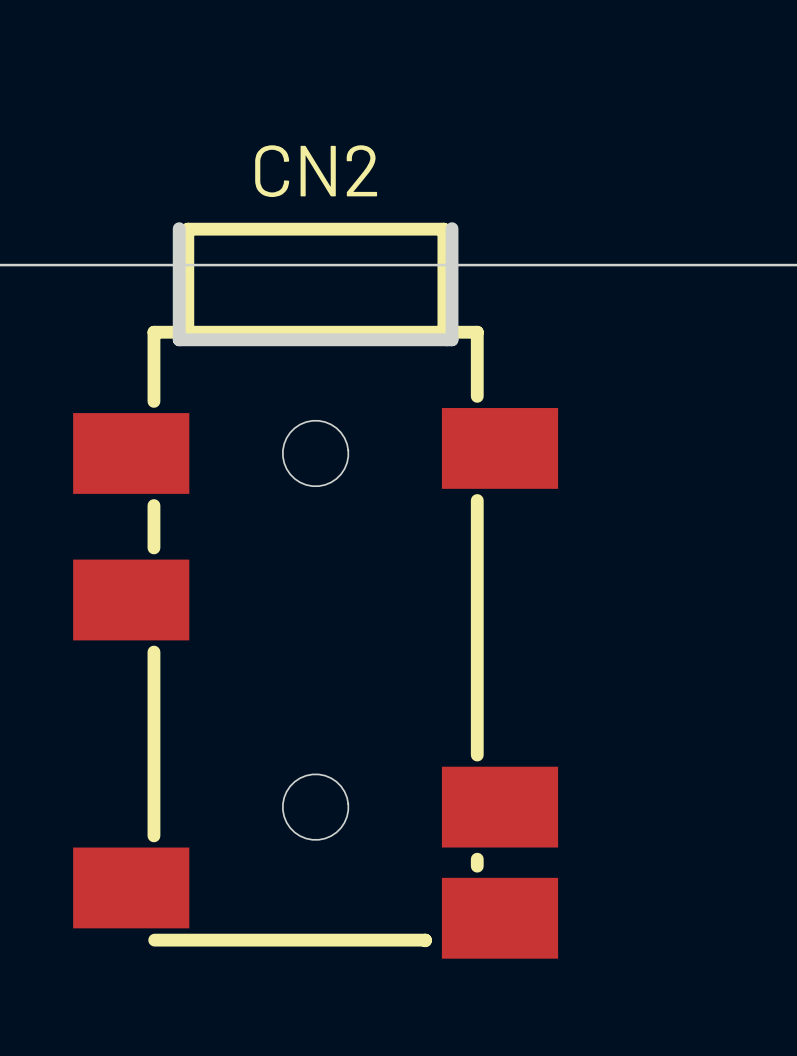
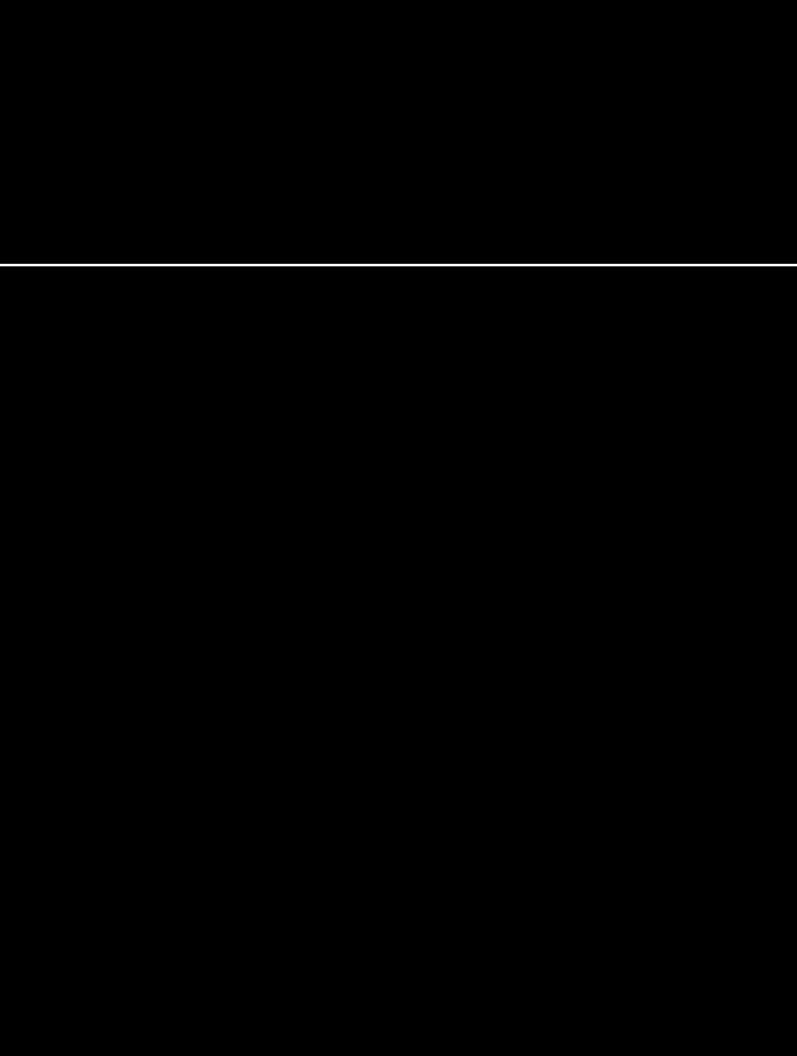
CN2: (315, 590) -> none

